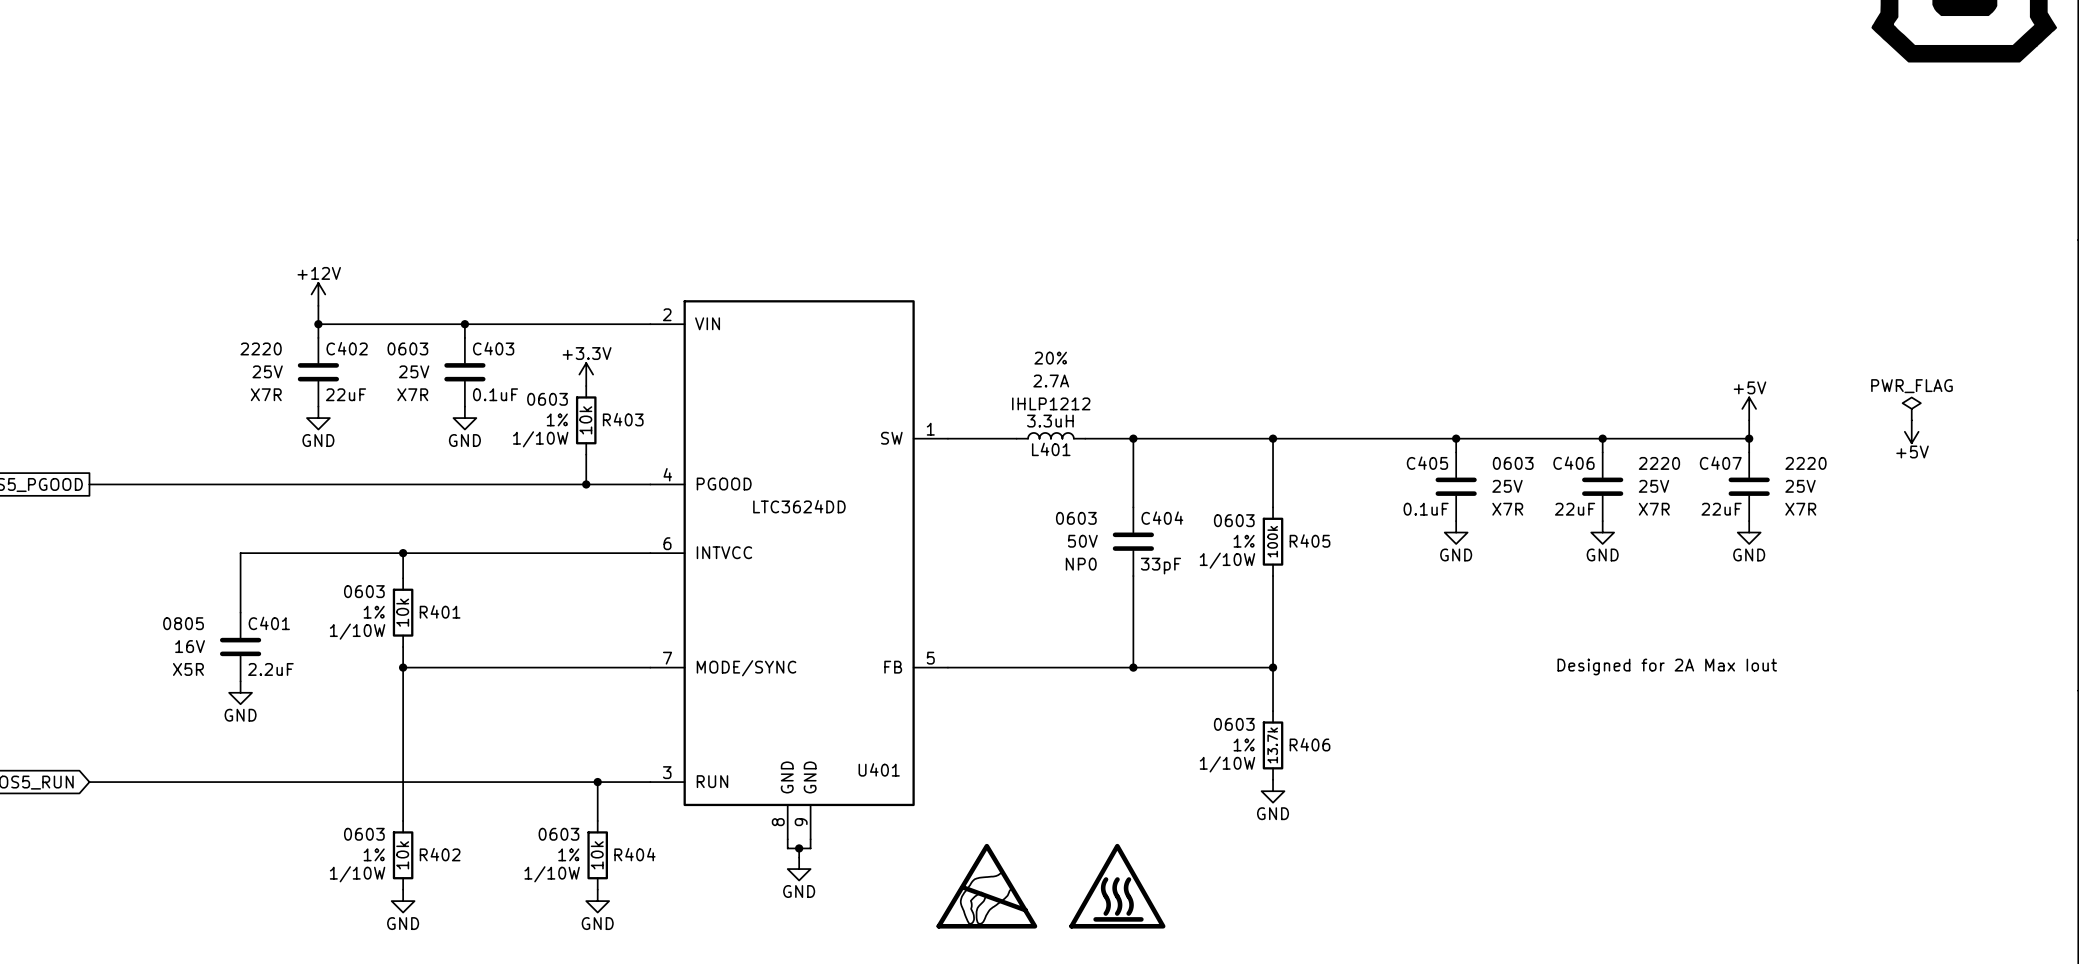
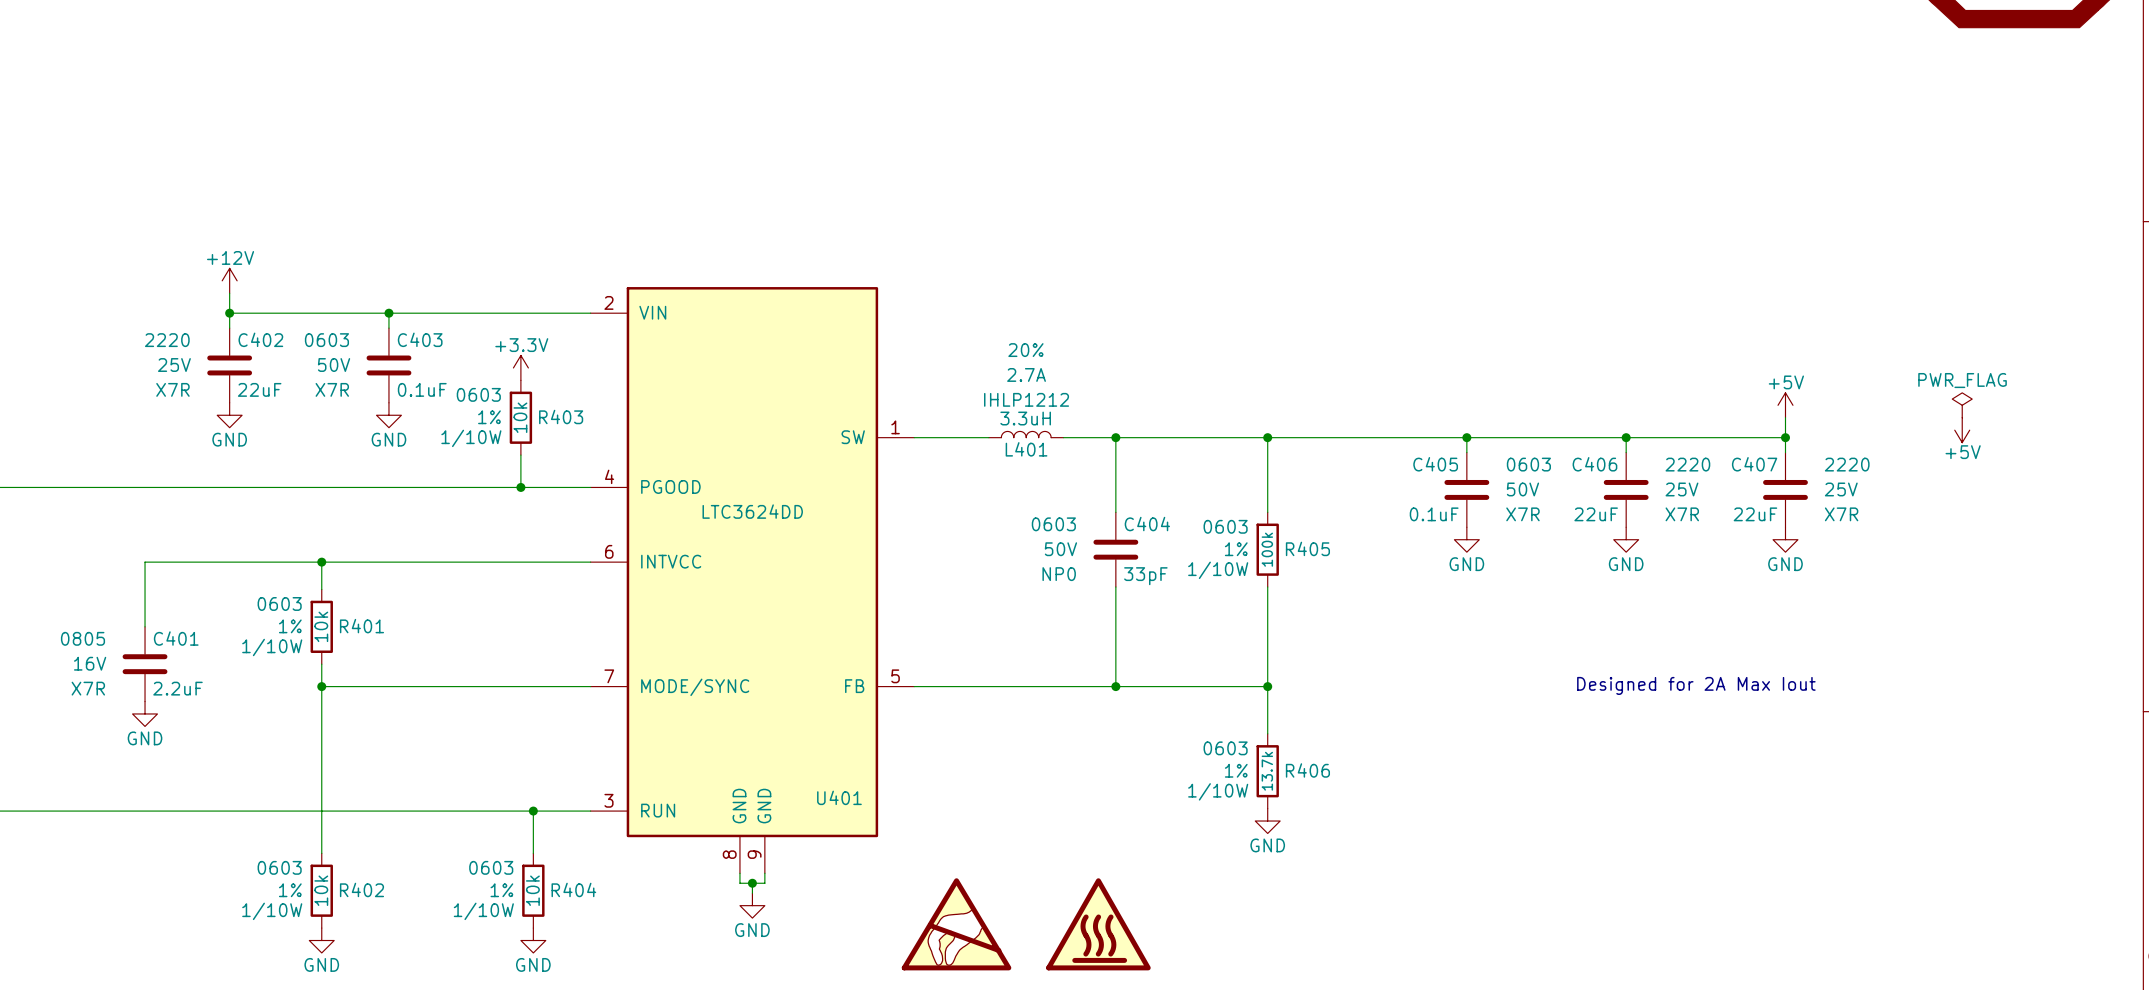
C403 text: 25V (414, 371) -> 50V (334, 365)
C405 text: 25V (1507, 486) -> 50V (1522, 489)
C401 text: X5R (188, 669) -> X7R (88, 688)

